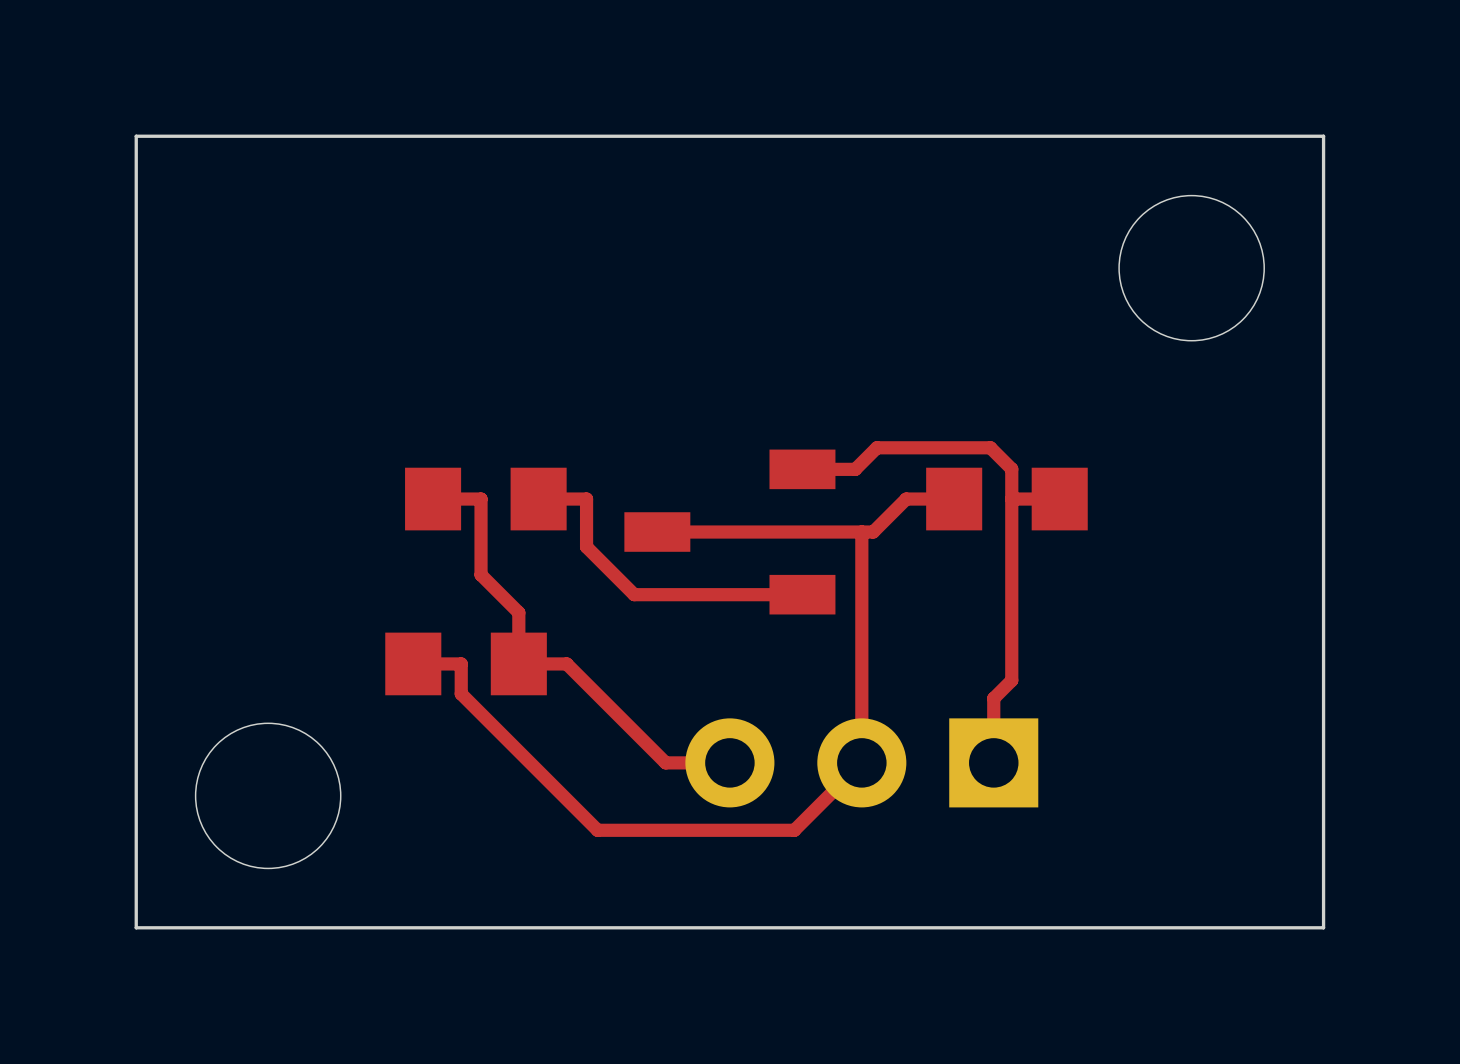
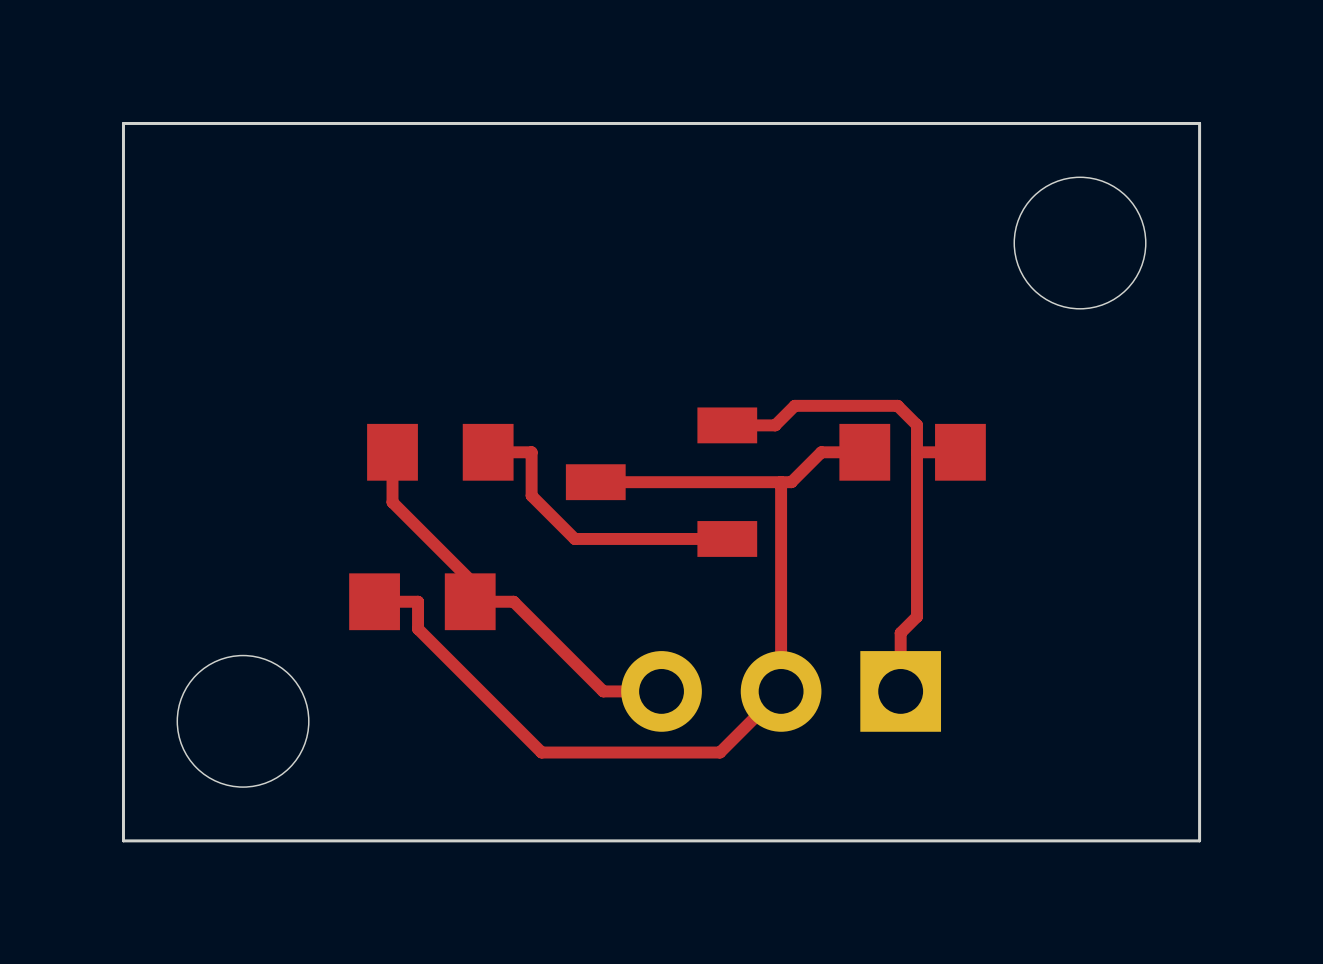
top track: (433, 499) (481, 499) (481, 574) (518, 612) (518, 663) -> (392, 452) (392, 502) (491, 601)

